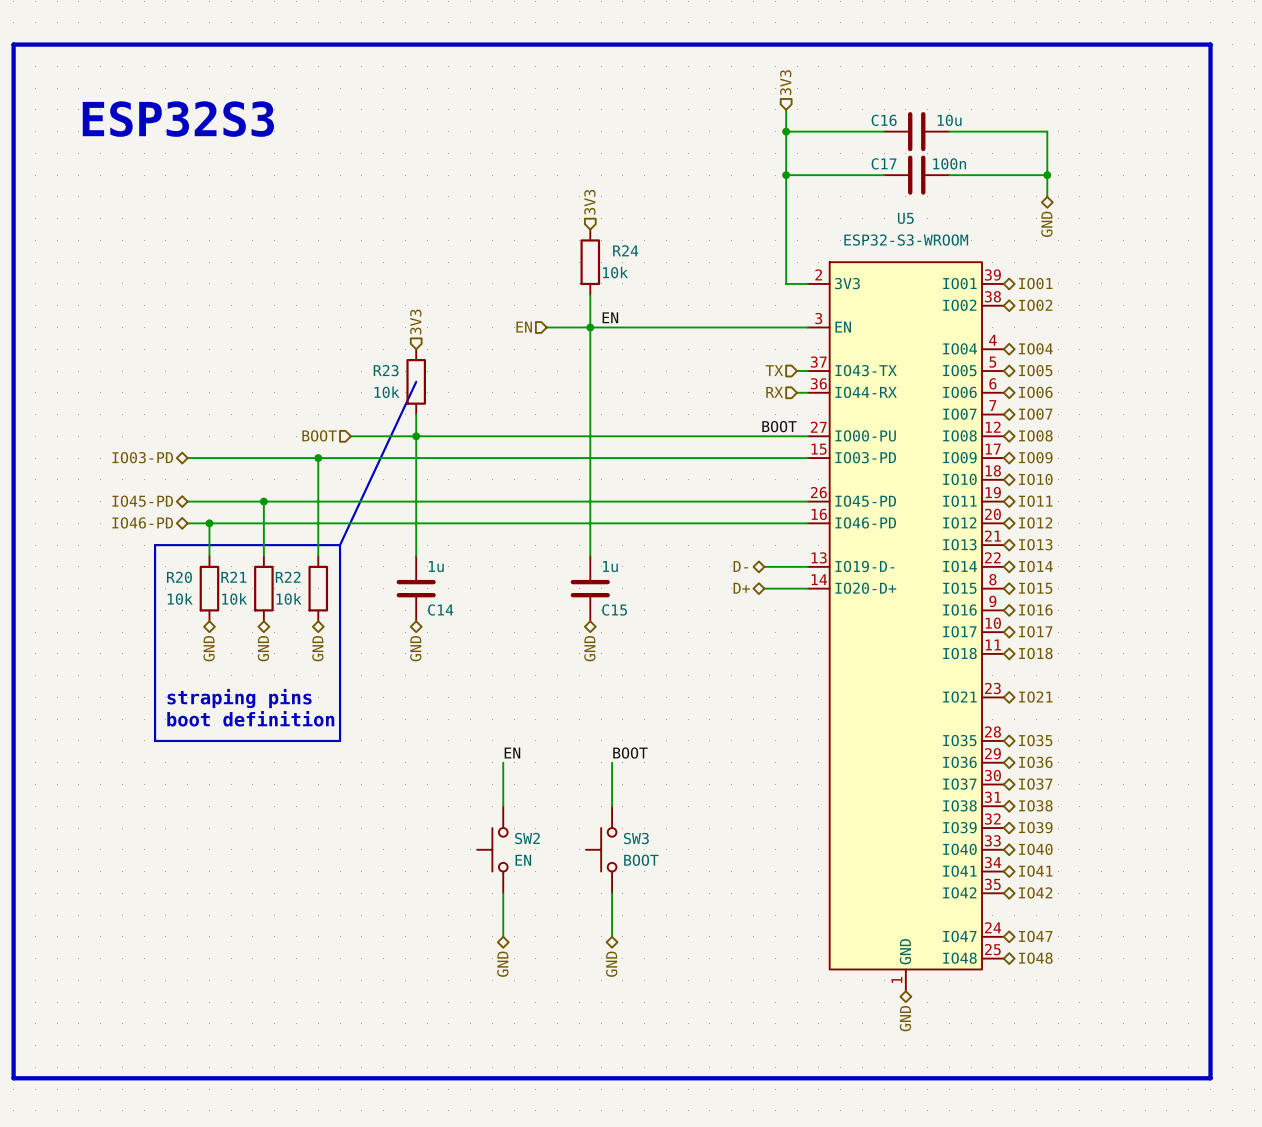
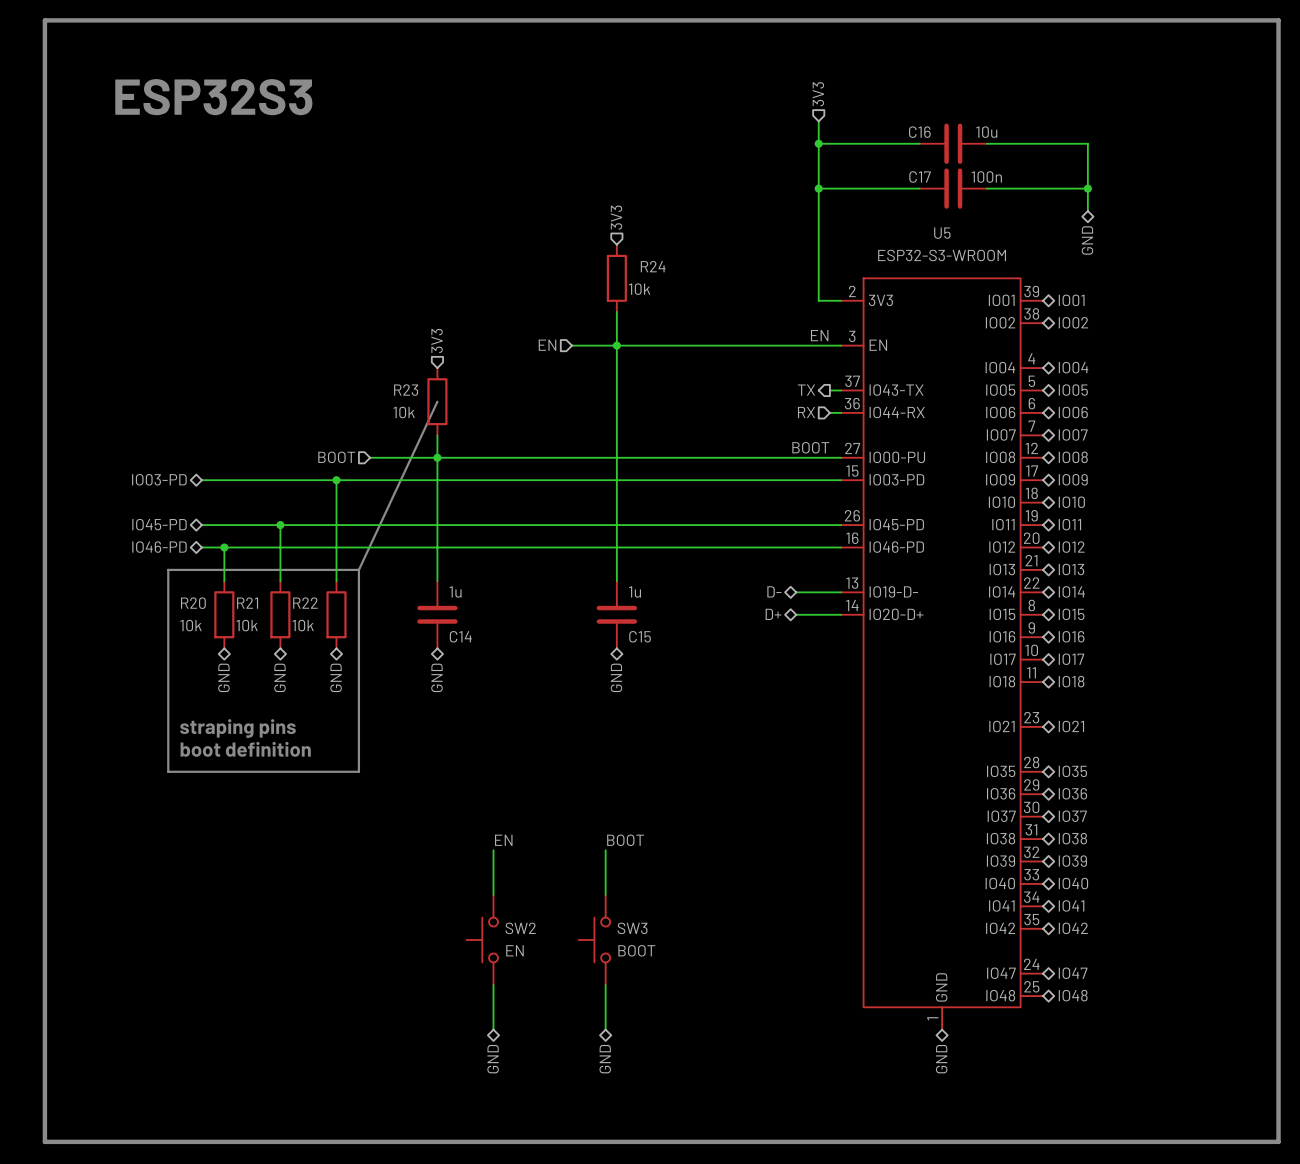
line: (13, 44) (1210, 44) (1210, 1078) (13, 1078) (13, 44) -> (44, 20) (44, 1141) (1278, 1141) (1278, 20) (44, 20)
text position: ESP32S3 (178, 119) -> ESP32S3 (213, 97)
label position: EN (610, 317) -> EN (819, 335)
hierarchical label shape: input (774, 370) -> output (806, 390)
label position: EN (512, 753) -> EN (503, 840)
label position: BOOT (630, 753) -> BOOT (625, 840)
wire: (503, 762) (503, 806) -> (493, 850) (493, 895)
wire: (612, 762) (612, 806) -> (605, 850) (605, 895)
SW2 position: (492, 849) -> (482, 940)
SW3 position: (601, 849) -> (594, 940)
wire: (503, 893) (503, 936) -> (493, 984) (493, 1029)
wire: (612, 893) (612, 936) -> (605, 984) (605, 1029)
hierarchical label: GND (502, 964) -> none
hierarchical label: GND (611, 964) -> none
hierarchical label: none -> GND (493, 1059)
hierarchical label: none -> GND (605, 1059)

